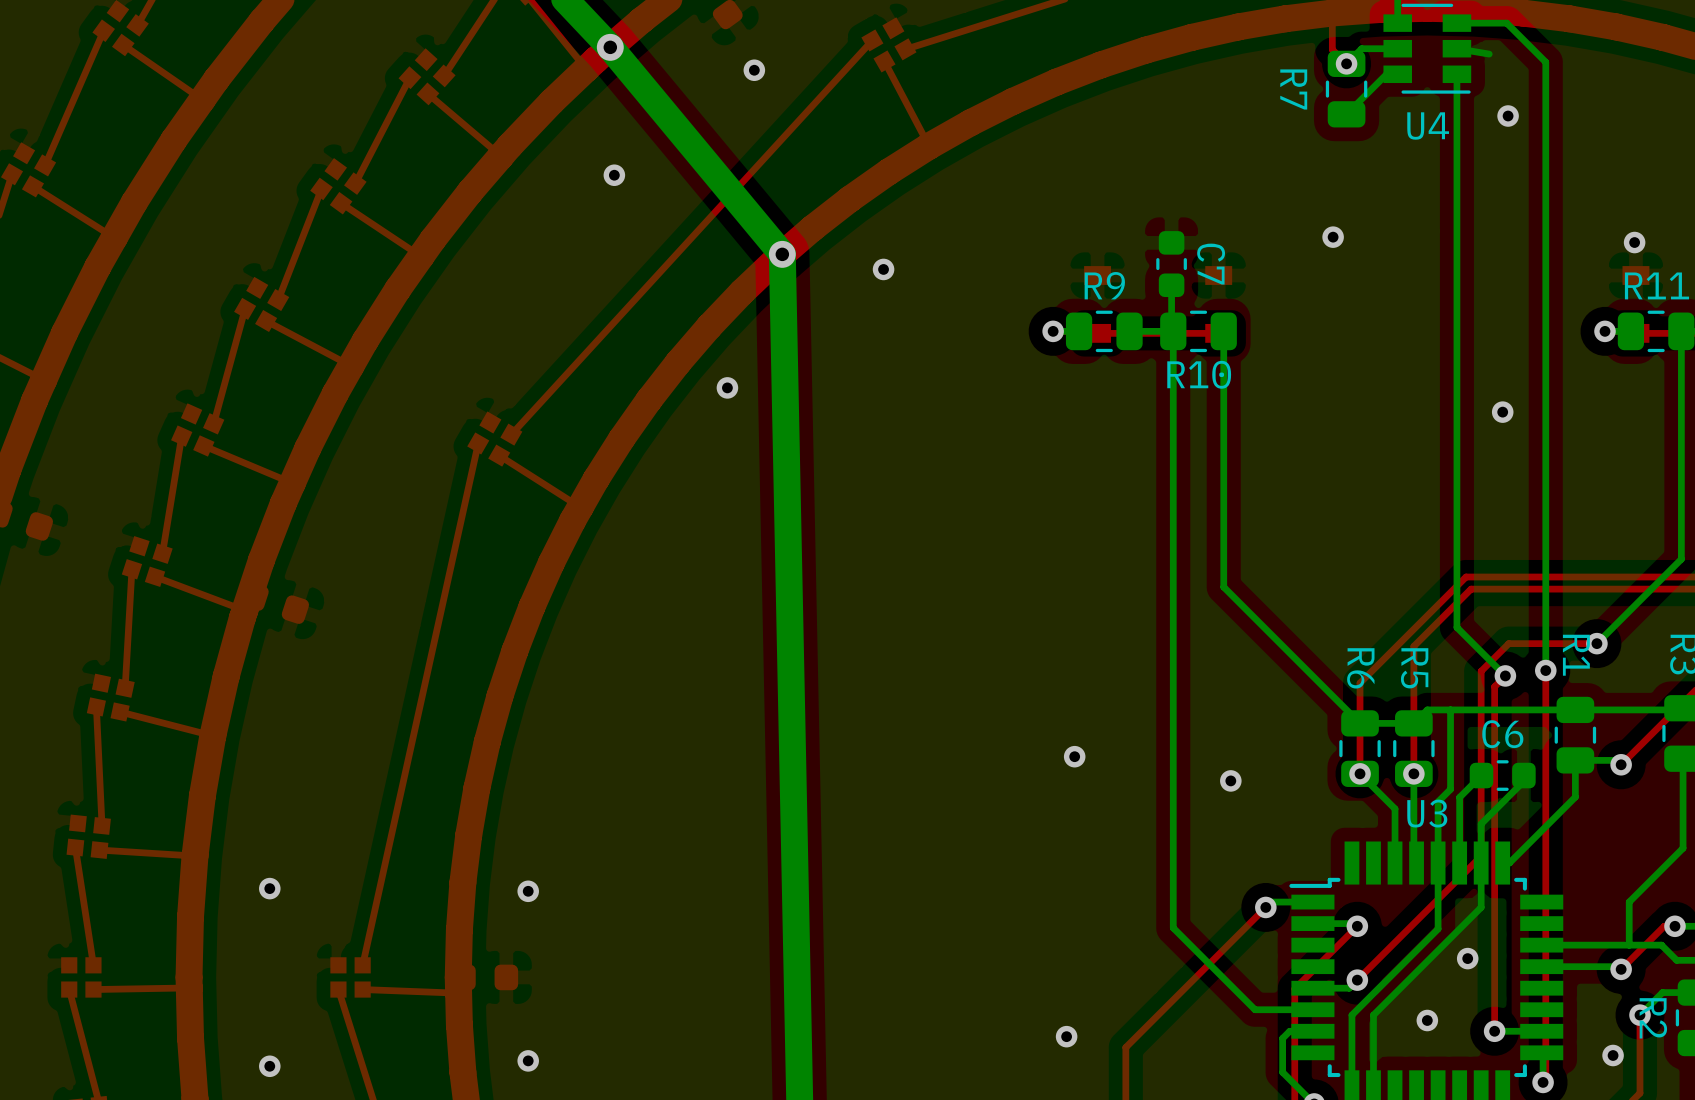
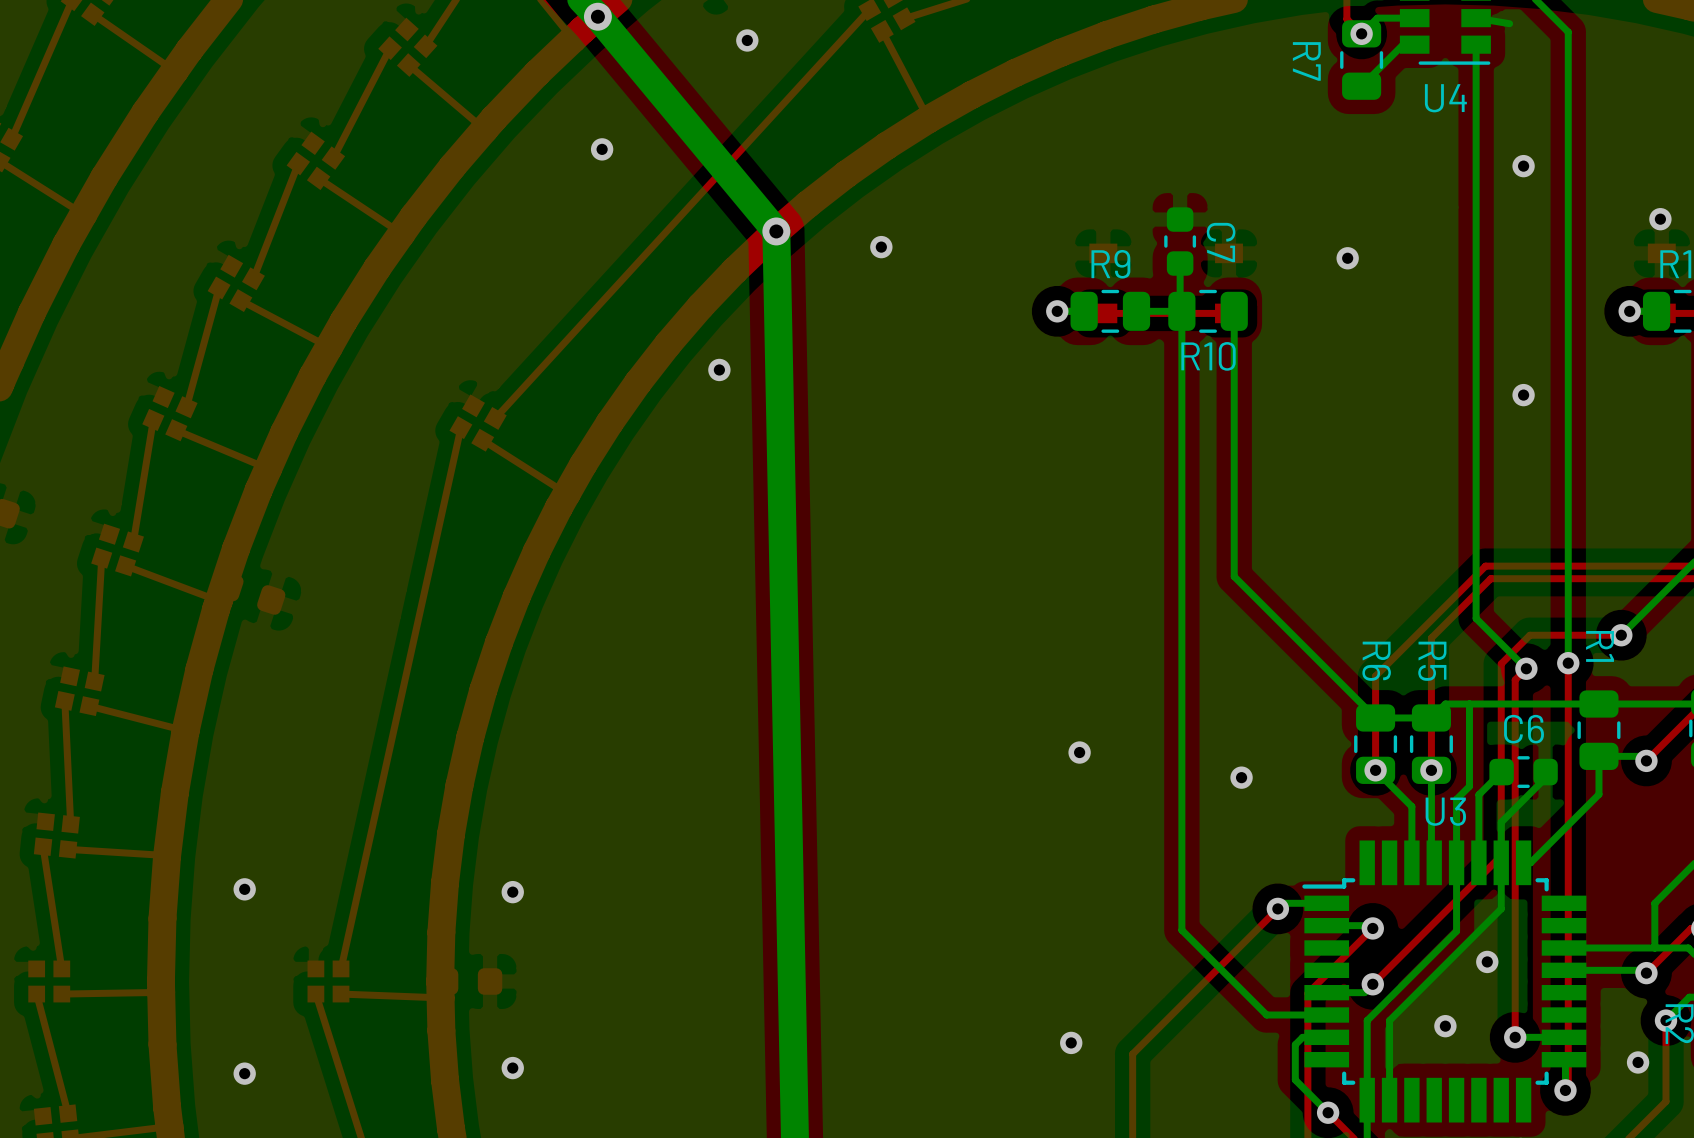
via position: (1508, 116) -> (1523, 166)
via position: (1333, 237) -> (1347, 258)

